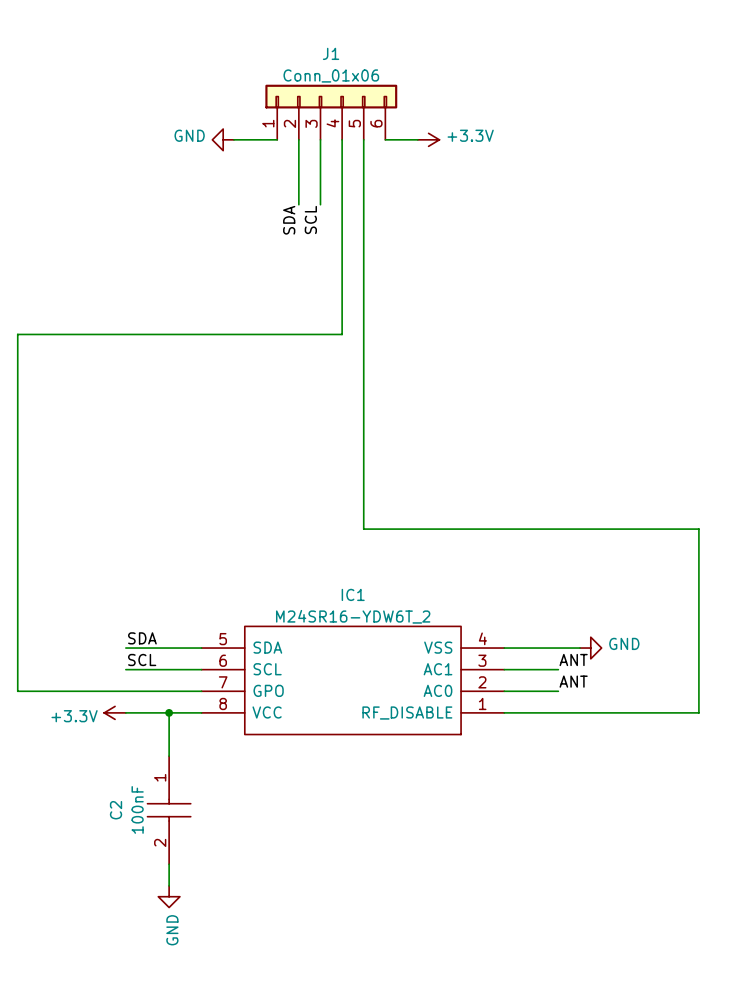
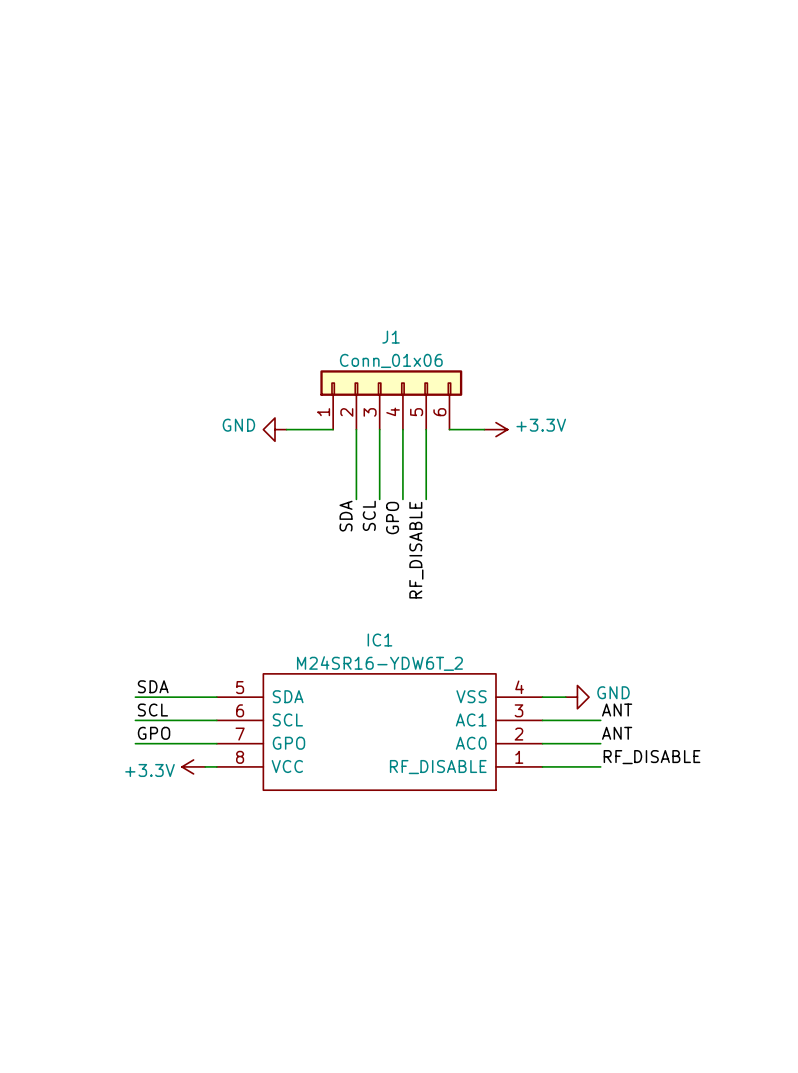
J1 position: (331, 112) -> (391, 399)
power symbol: GND (223, 139) -> none
wire: (233, 139) (277, 139) -> none
wire: (298, 139) (298, 204) -> none
wire: (320, 139) (320, 204) -> none
wire: (342, 139) (342, 334) (17, 334) (17, 691) (125, 691) -> none
wire: (363, 139) (363, 529) (698, 529) (698, 712) (558, 712) -> none
wire: (385, 139) (417, 139) -> none
power symbol: +3.3V (428, 139) -> none
label: SCL (310, 219) -> none
label: SDA (289, 220) -> none
power symbol: none -> GND (274, 429)
wire: none -> (286, 429) (333, 429)
wire: none -> (356, 429) (356, 499)
wire: none -> (379, 429) (379, 499)
wire: none -> (402, 429) (402, 499)
wire: none -> (426, 429) (426, 499)
wire: none -> (449, 429) (484, 429)
power symbol: none -> +3.3V (496, 429)
label: none -> SDA (346, 516)
label: none -> SCL (369, 515)
label: none -> GPO (392, 518)
label: none -> RF_DISABLE (416, 550)
wire: (525, 648) (579, 648) -> none
power symbol position: GND (590, 648) -> GND (577, 697)
label: none -> GPO (154, 733)
label: none -> RF_DISABLE (652, 757)
power symbol position: +3.3V (115, 712) -> +3.3V (193, 766)
wire: (125, 712) (190, 712) -> none
wire: (169, 712) (169, 756) -> none
junction: (169, 712) -> none
C2: 100nF (169, 810) -> none
wire: (169, 864) (169, 885) -> none
power symbol: GND (169, 896) -> none

